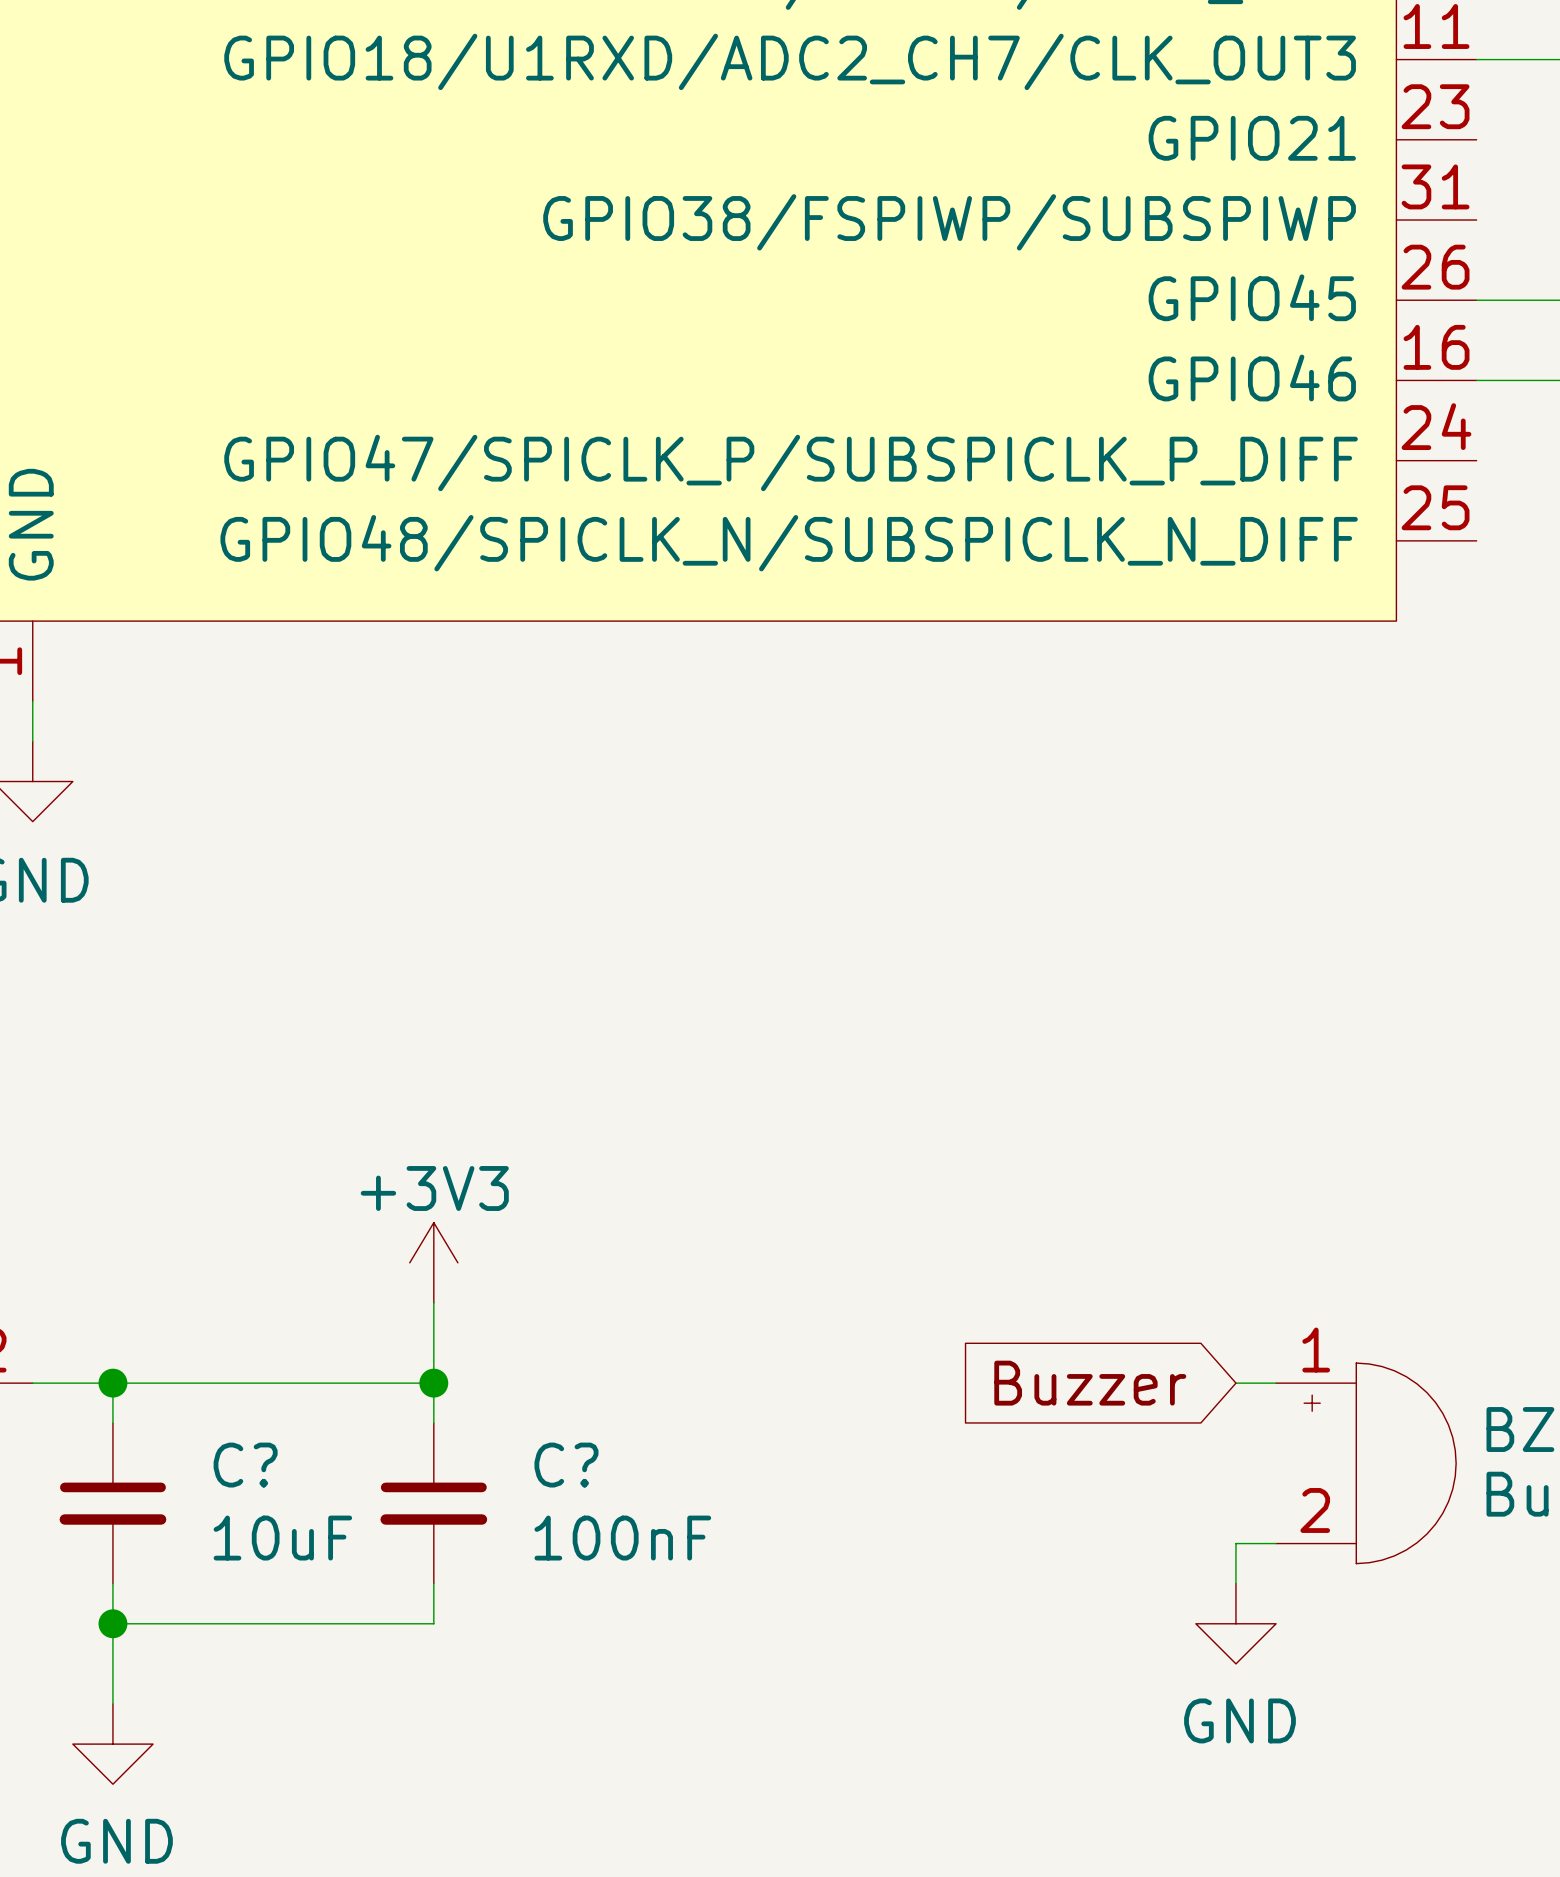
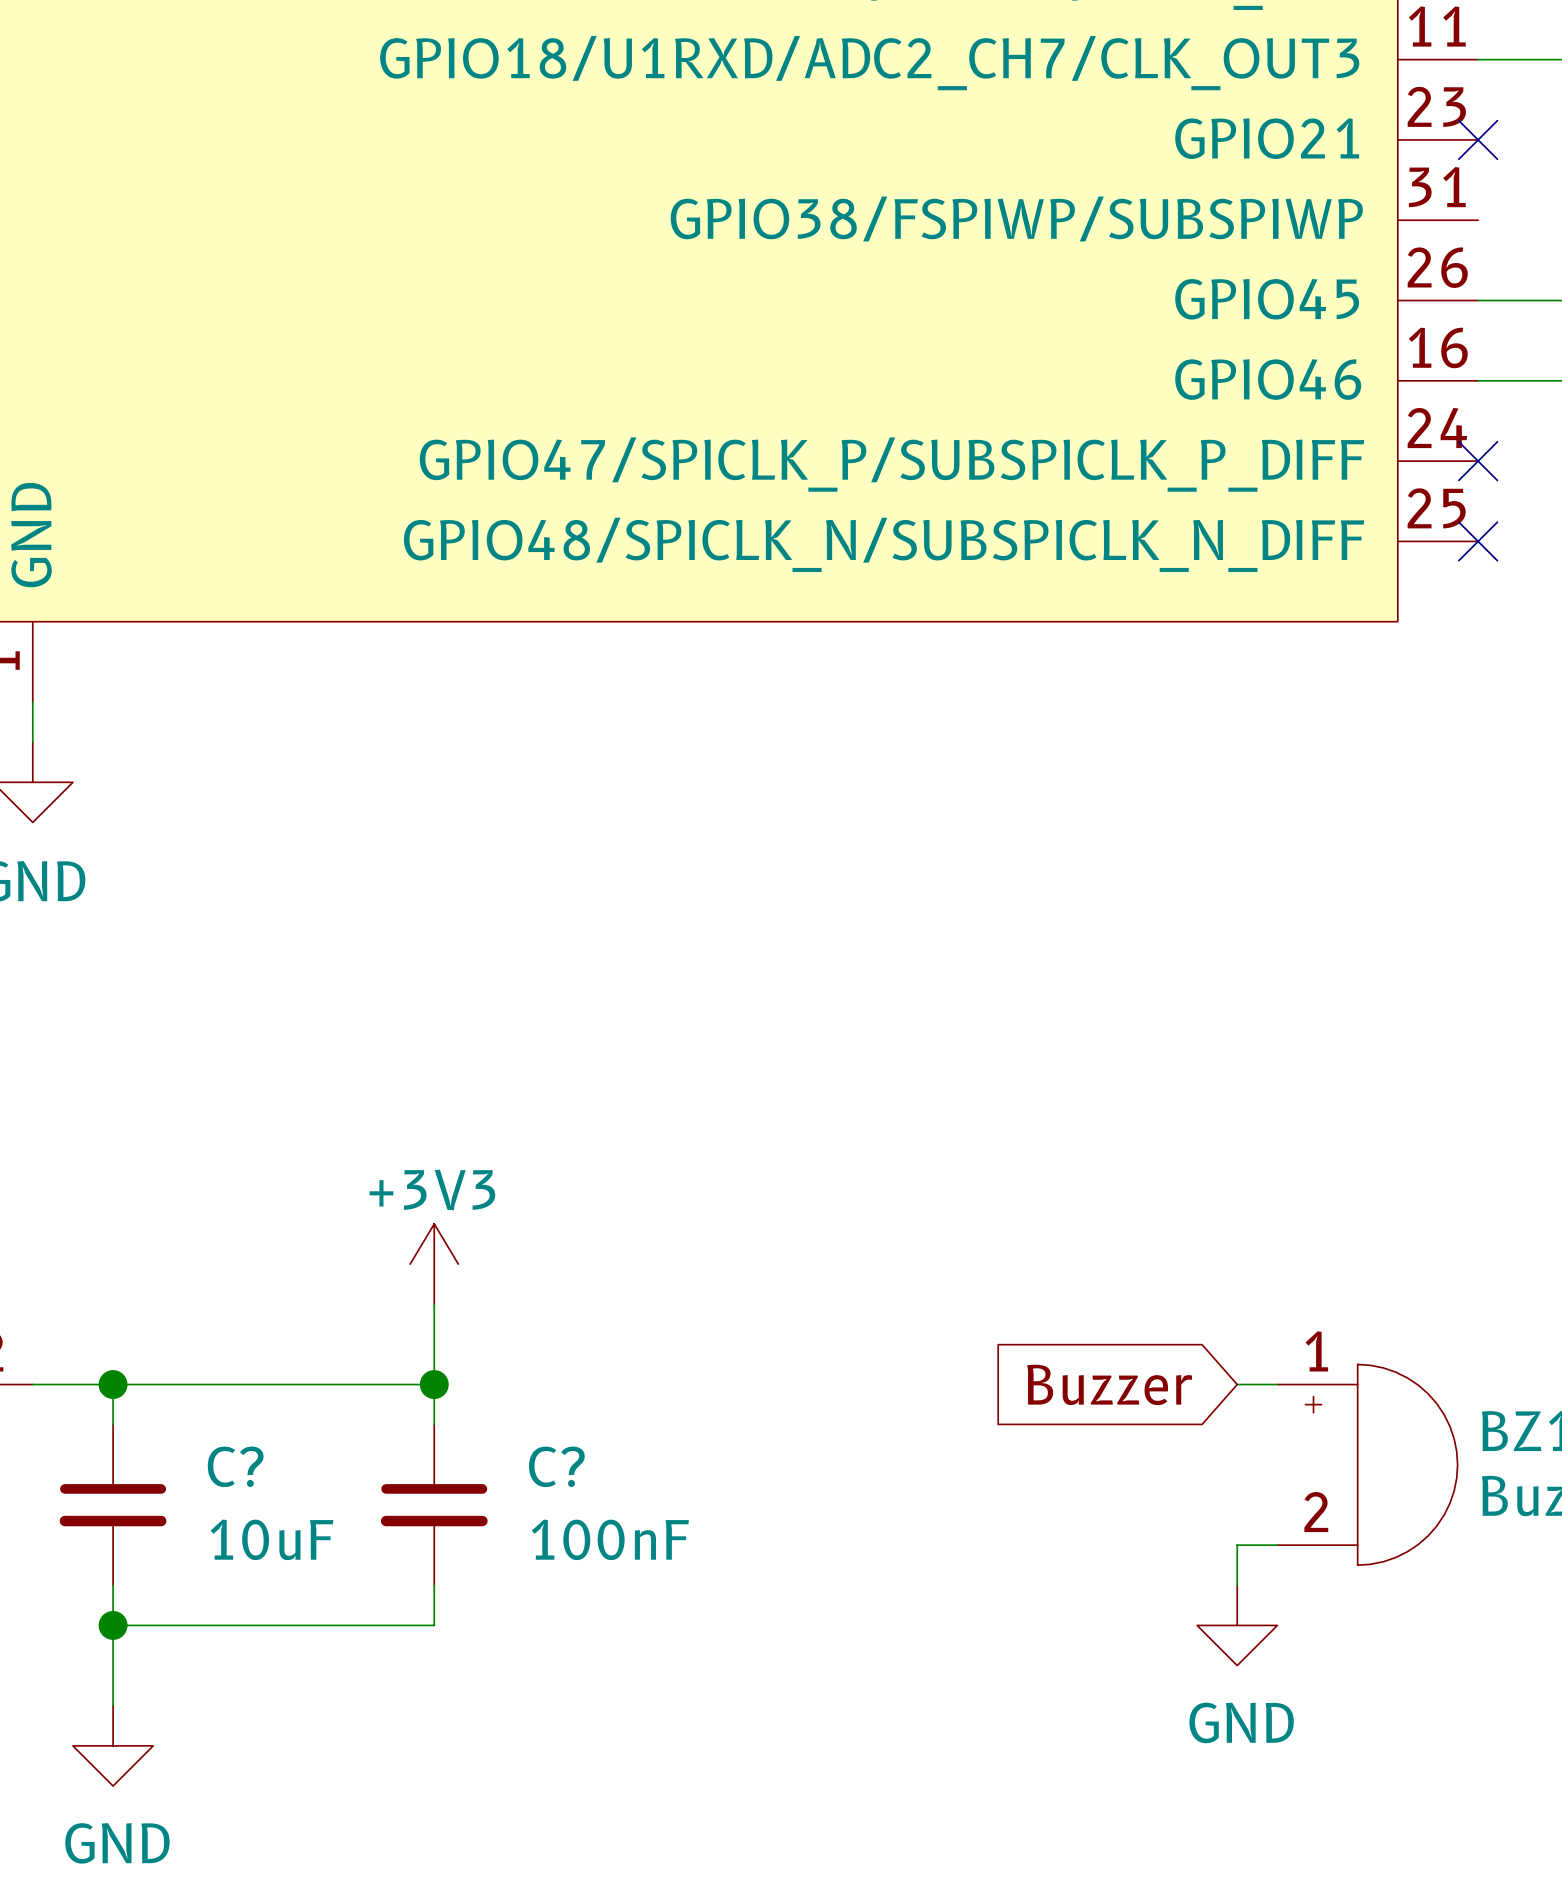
no-connect mark: none -> (1478, 139)
no-connect mark: none -> (1478, 461)
no-connect mark: none -> (1478, 541)

